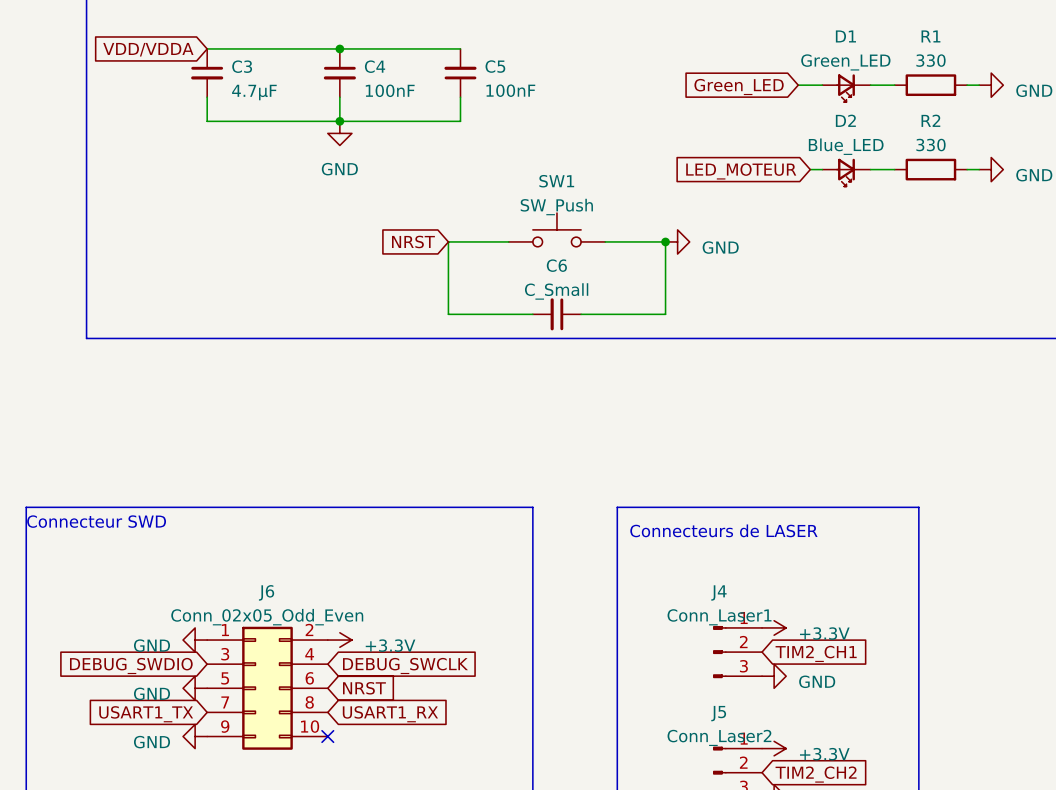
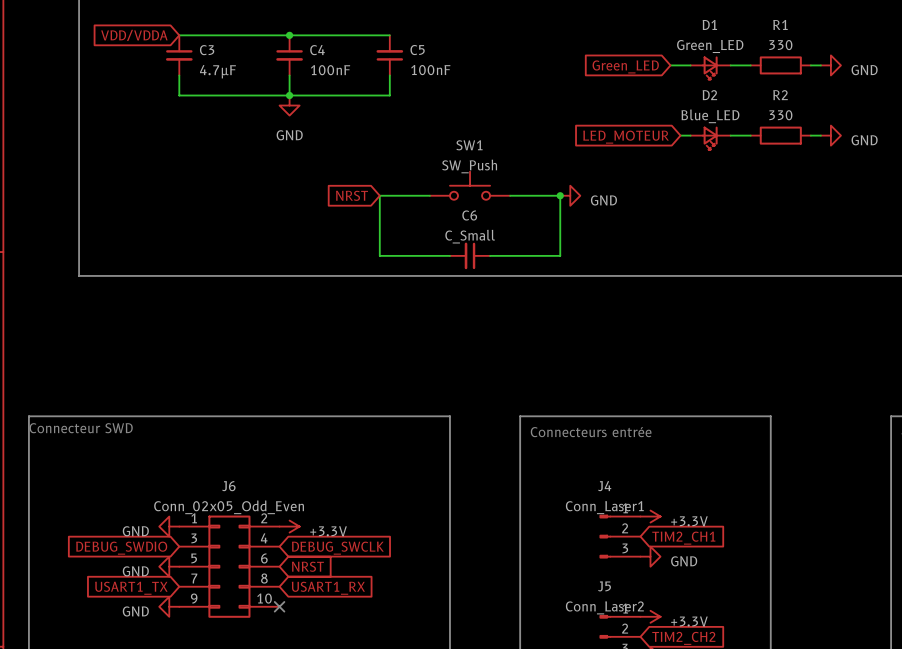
text: Connecteurs de LASER (723, 530) -> Connecteurs entrée (591, 432)

